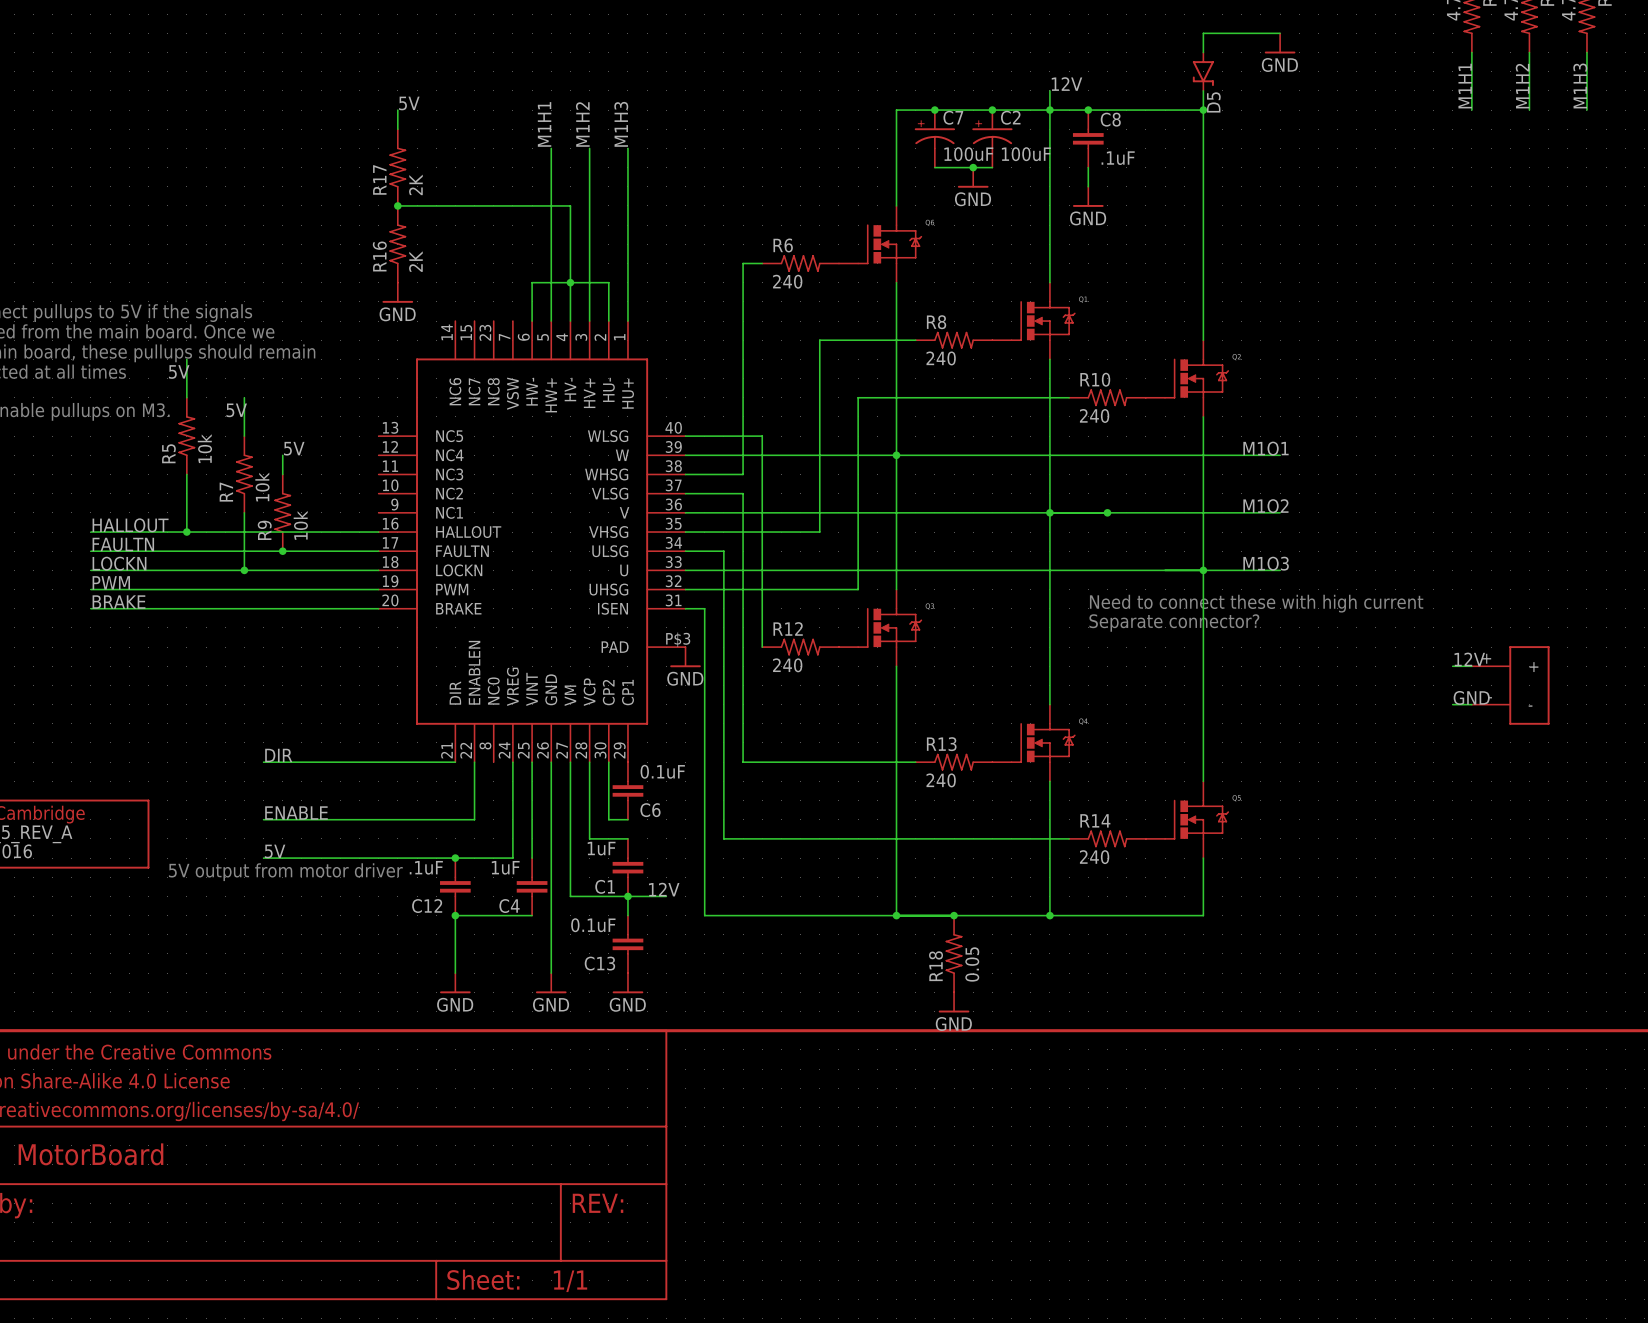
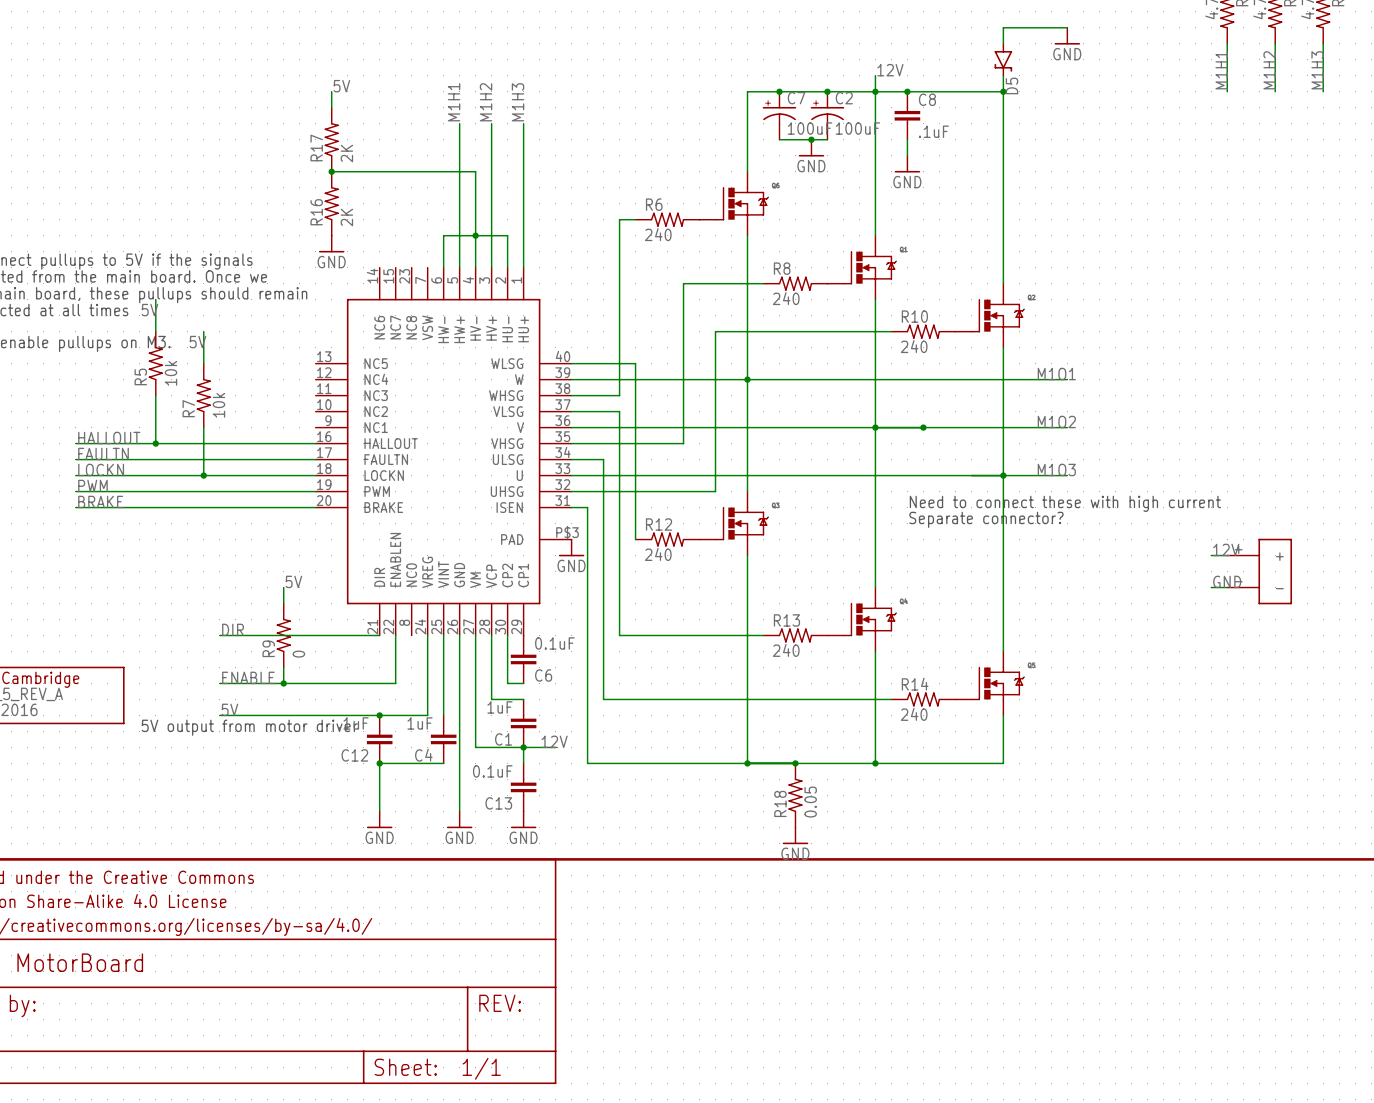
label: 5V (294, 448) -> none
wire: (282, 455) (282, 474) -> none
R9 position: (282, 512) -> (283, 635)
R9 value: 10k (300, 525) -> 0 (298, 654)
junction: (282, 551) -> none
label: none -> 5V (293, 581)
wire: none -> (283, 587) (283, 603)
wire: none -> (283, 667) (283, 683)
junction: none -> (283, 683)

